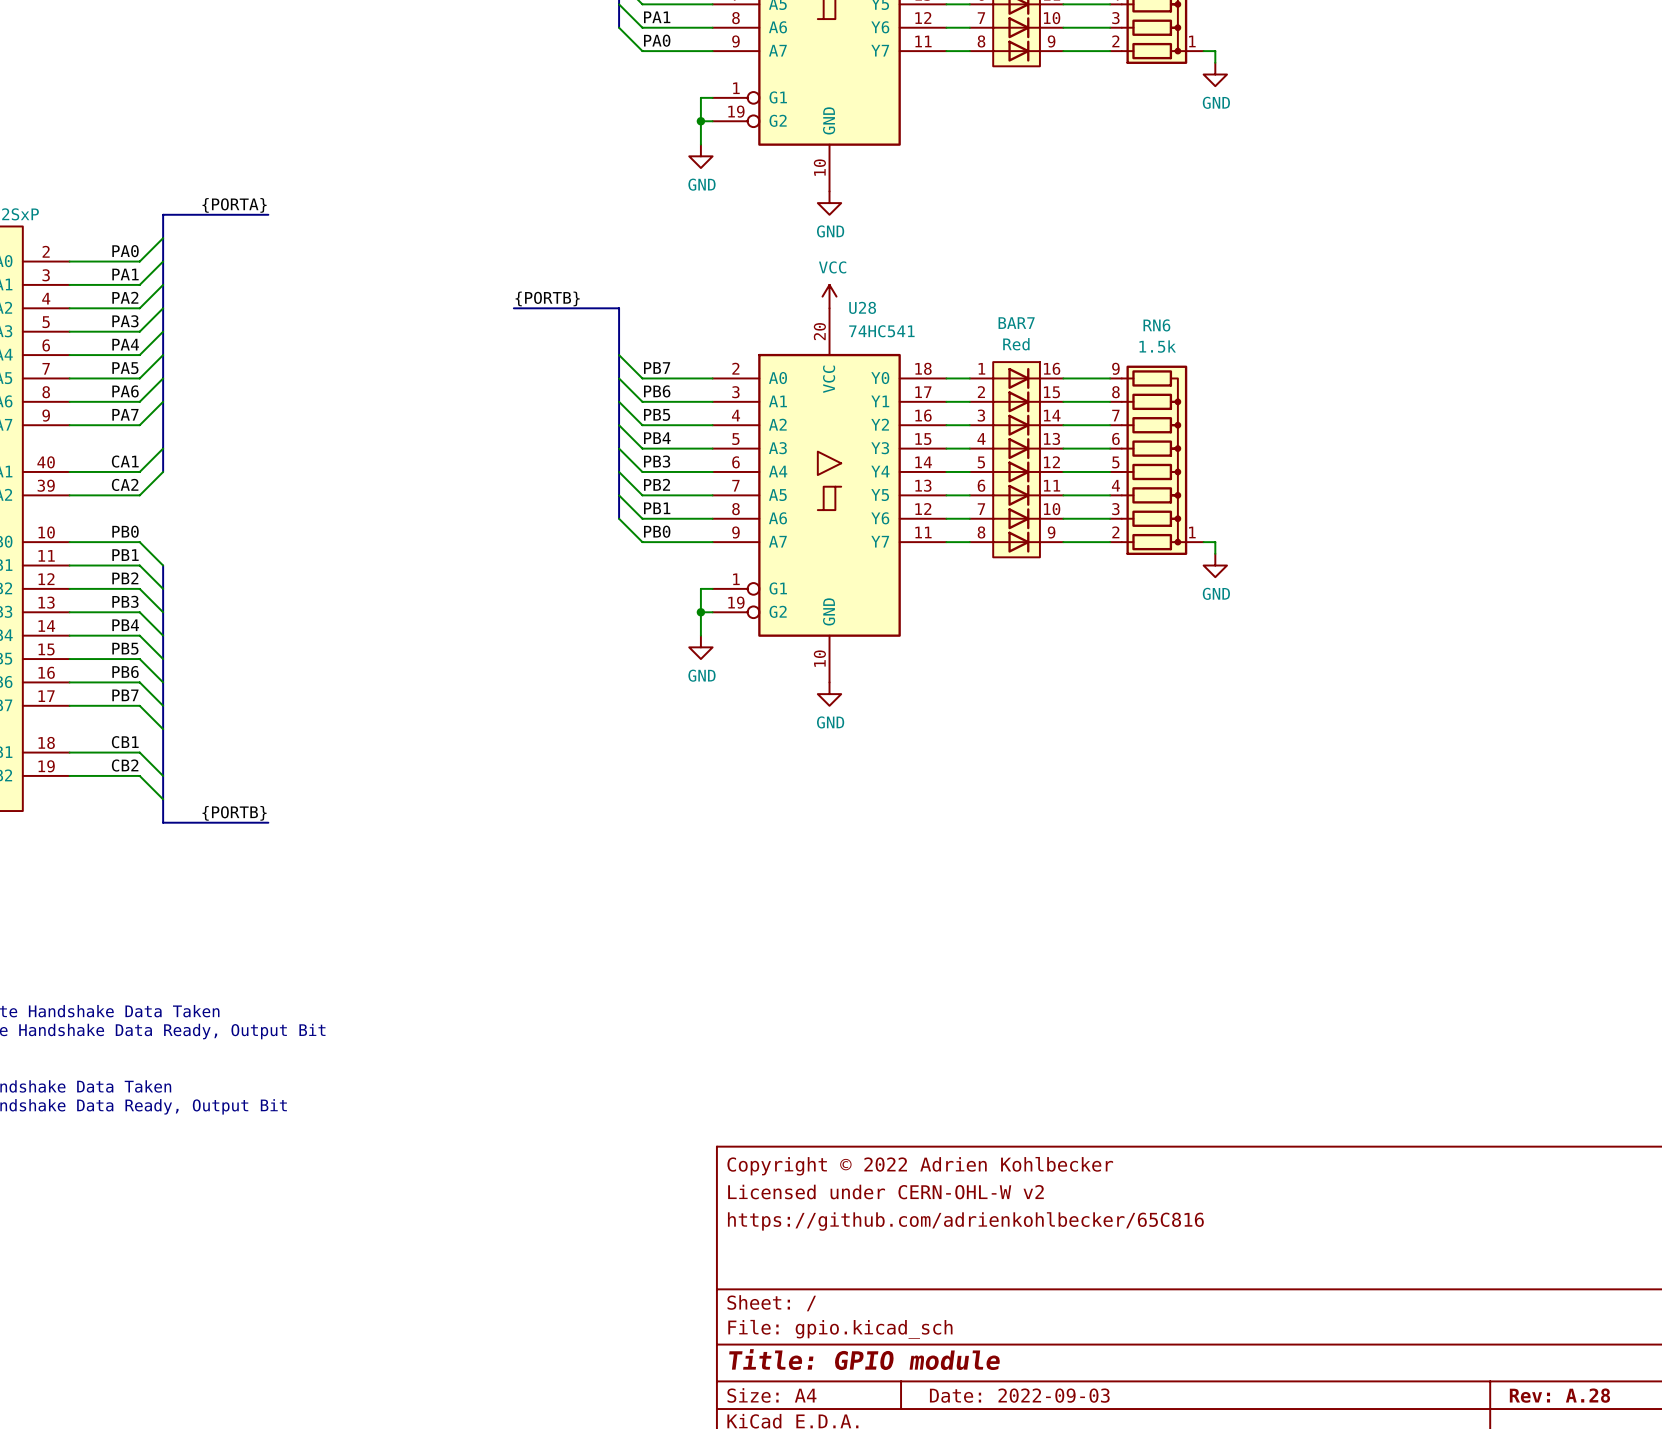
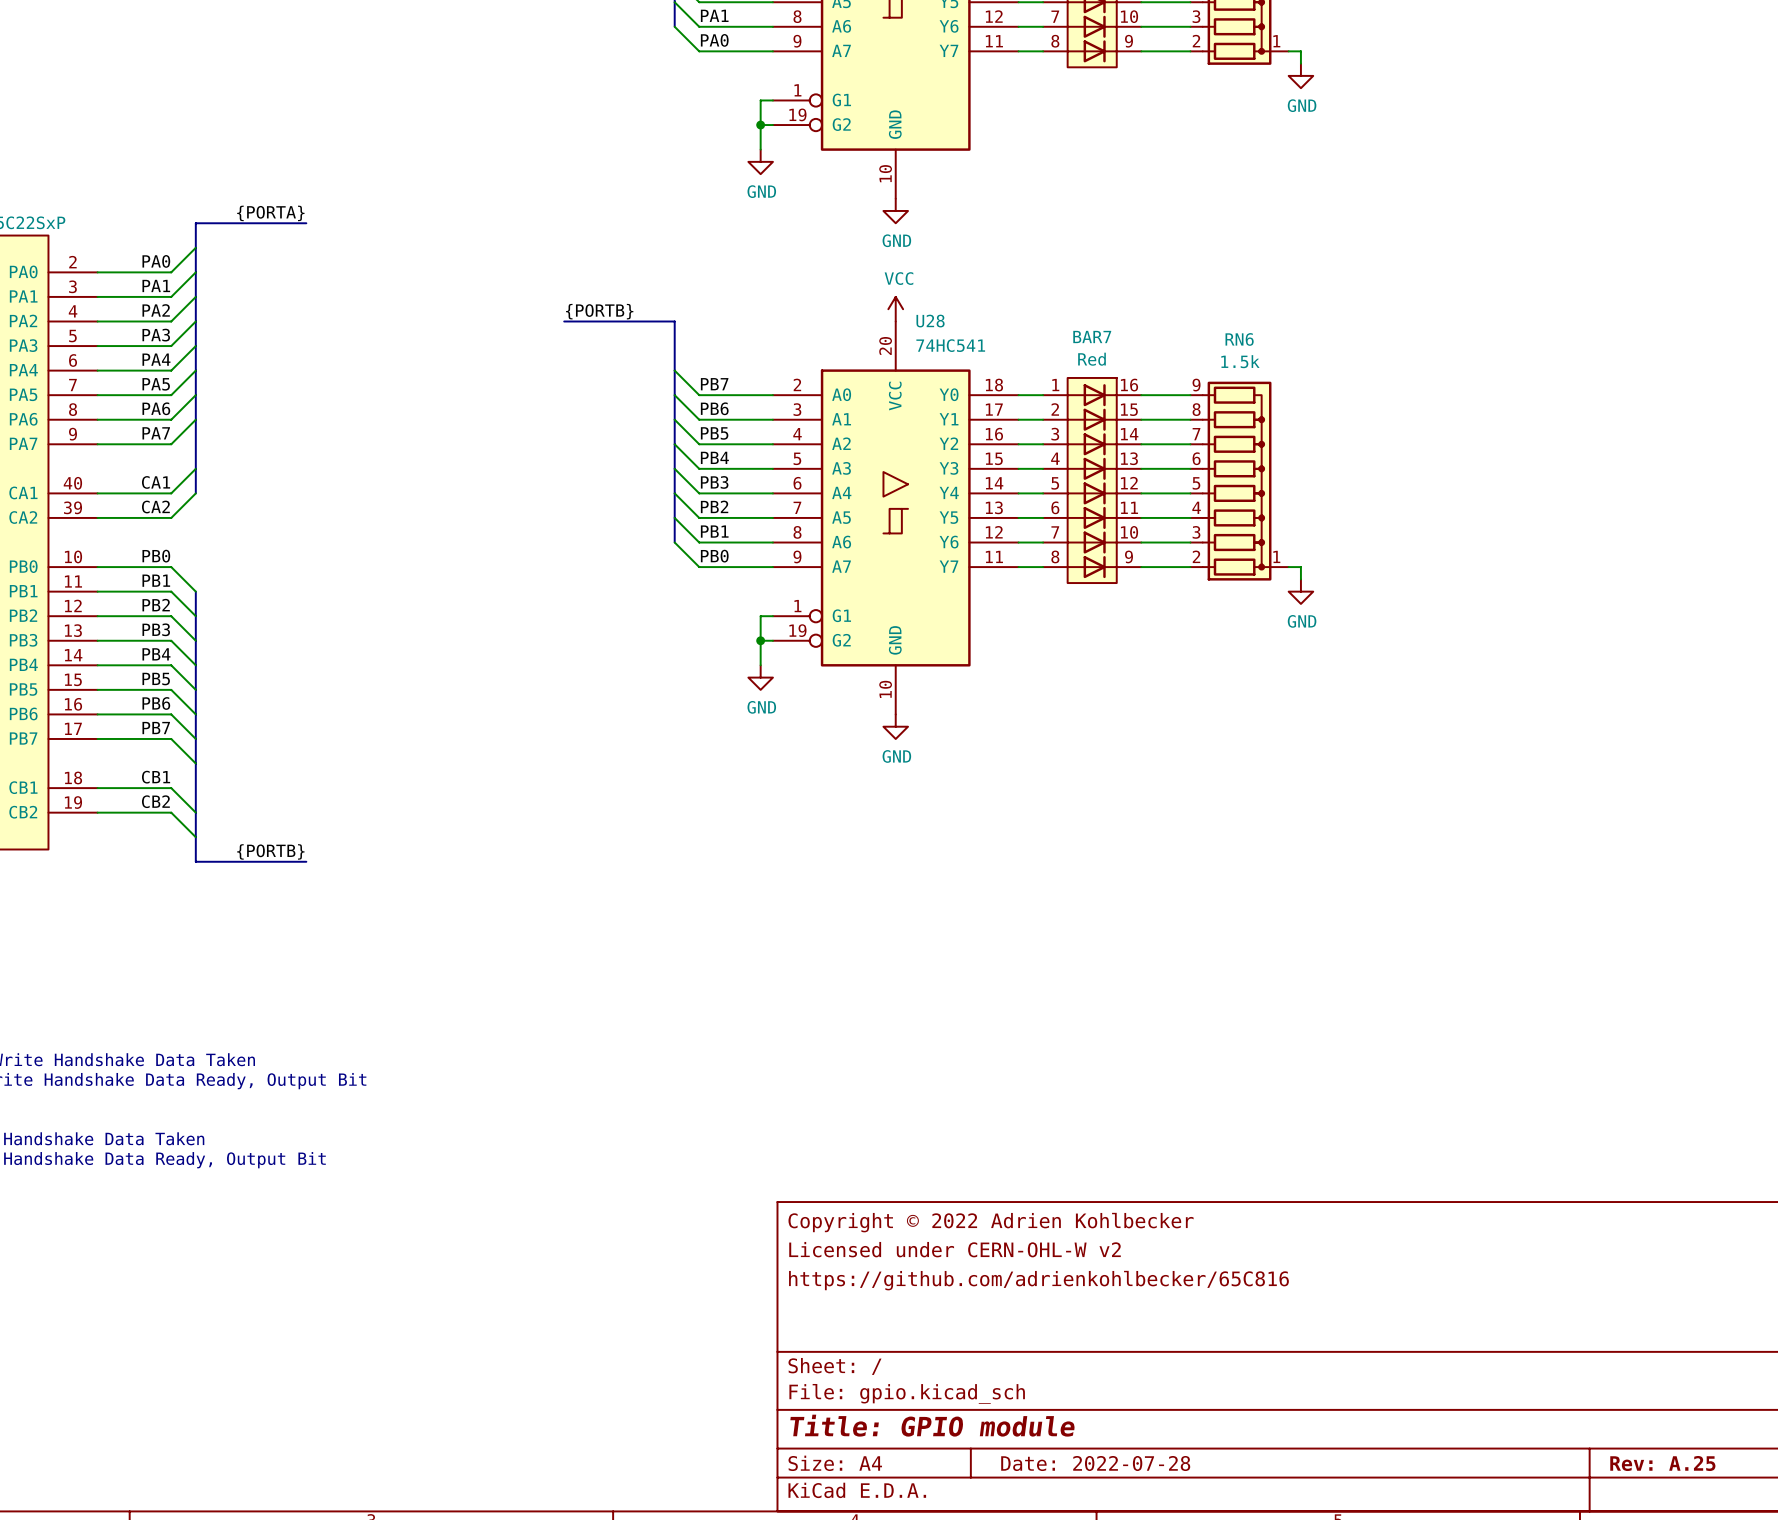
title block: Date: 2022-09-03 (1019, 1395) -> Date: 2022-07-28 (1095, 1463)
title block: Rev: A.28 (1559, 1395) -> Rev: A.25 (1662, 1463)

